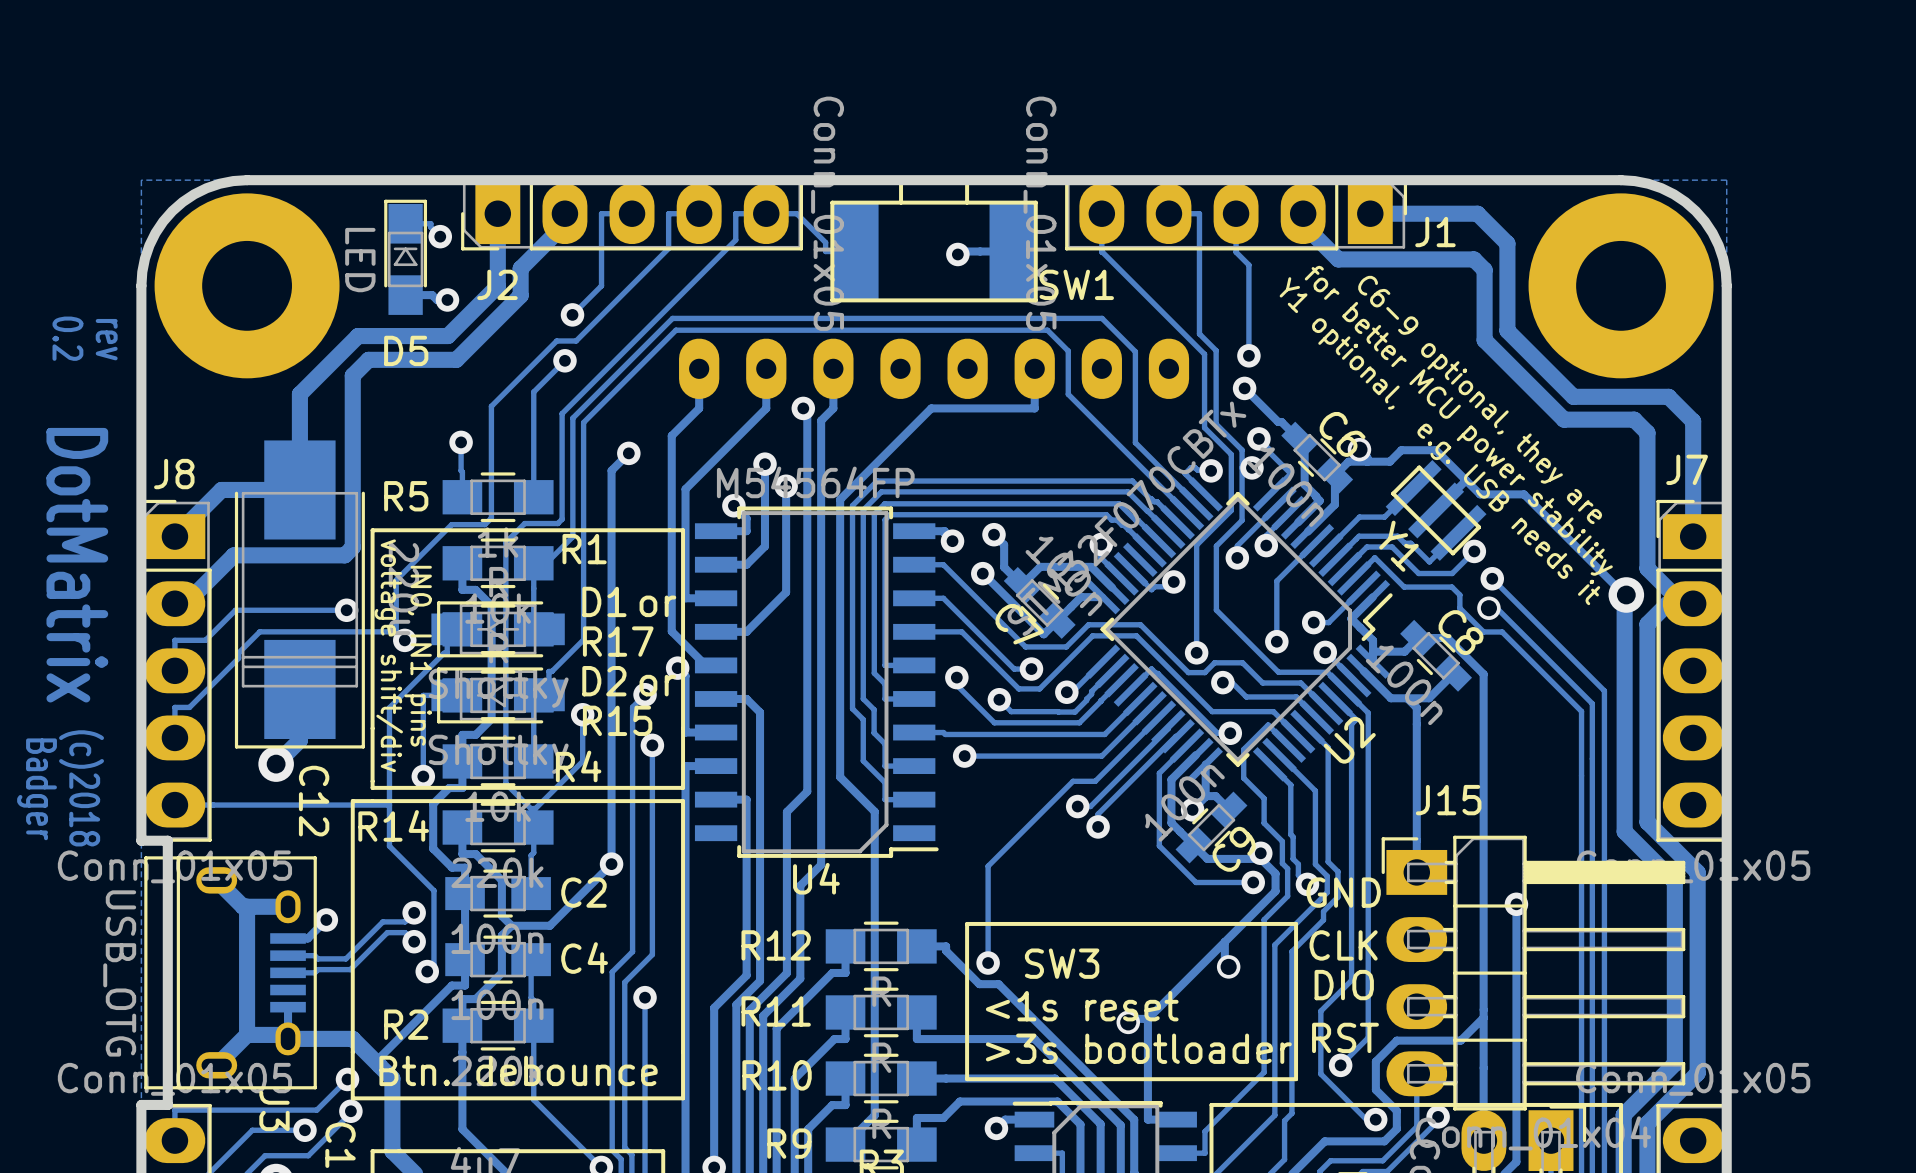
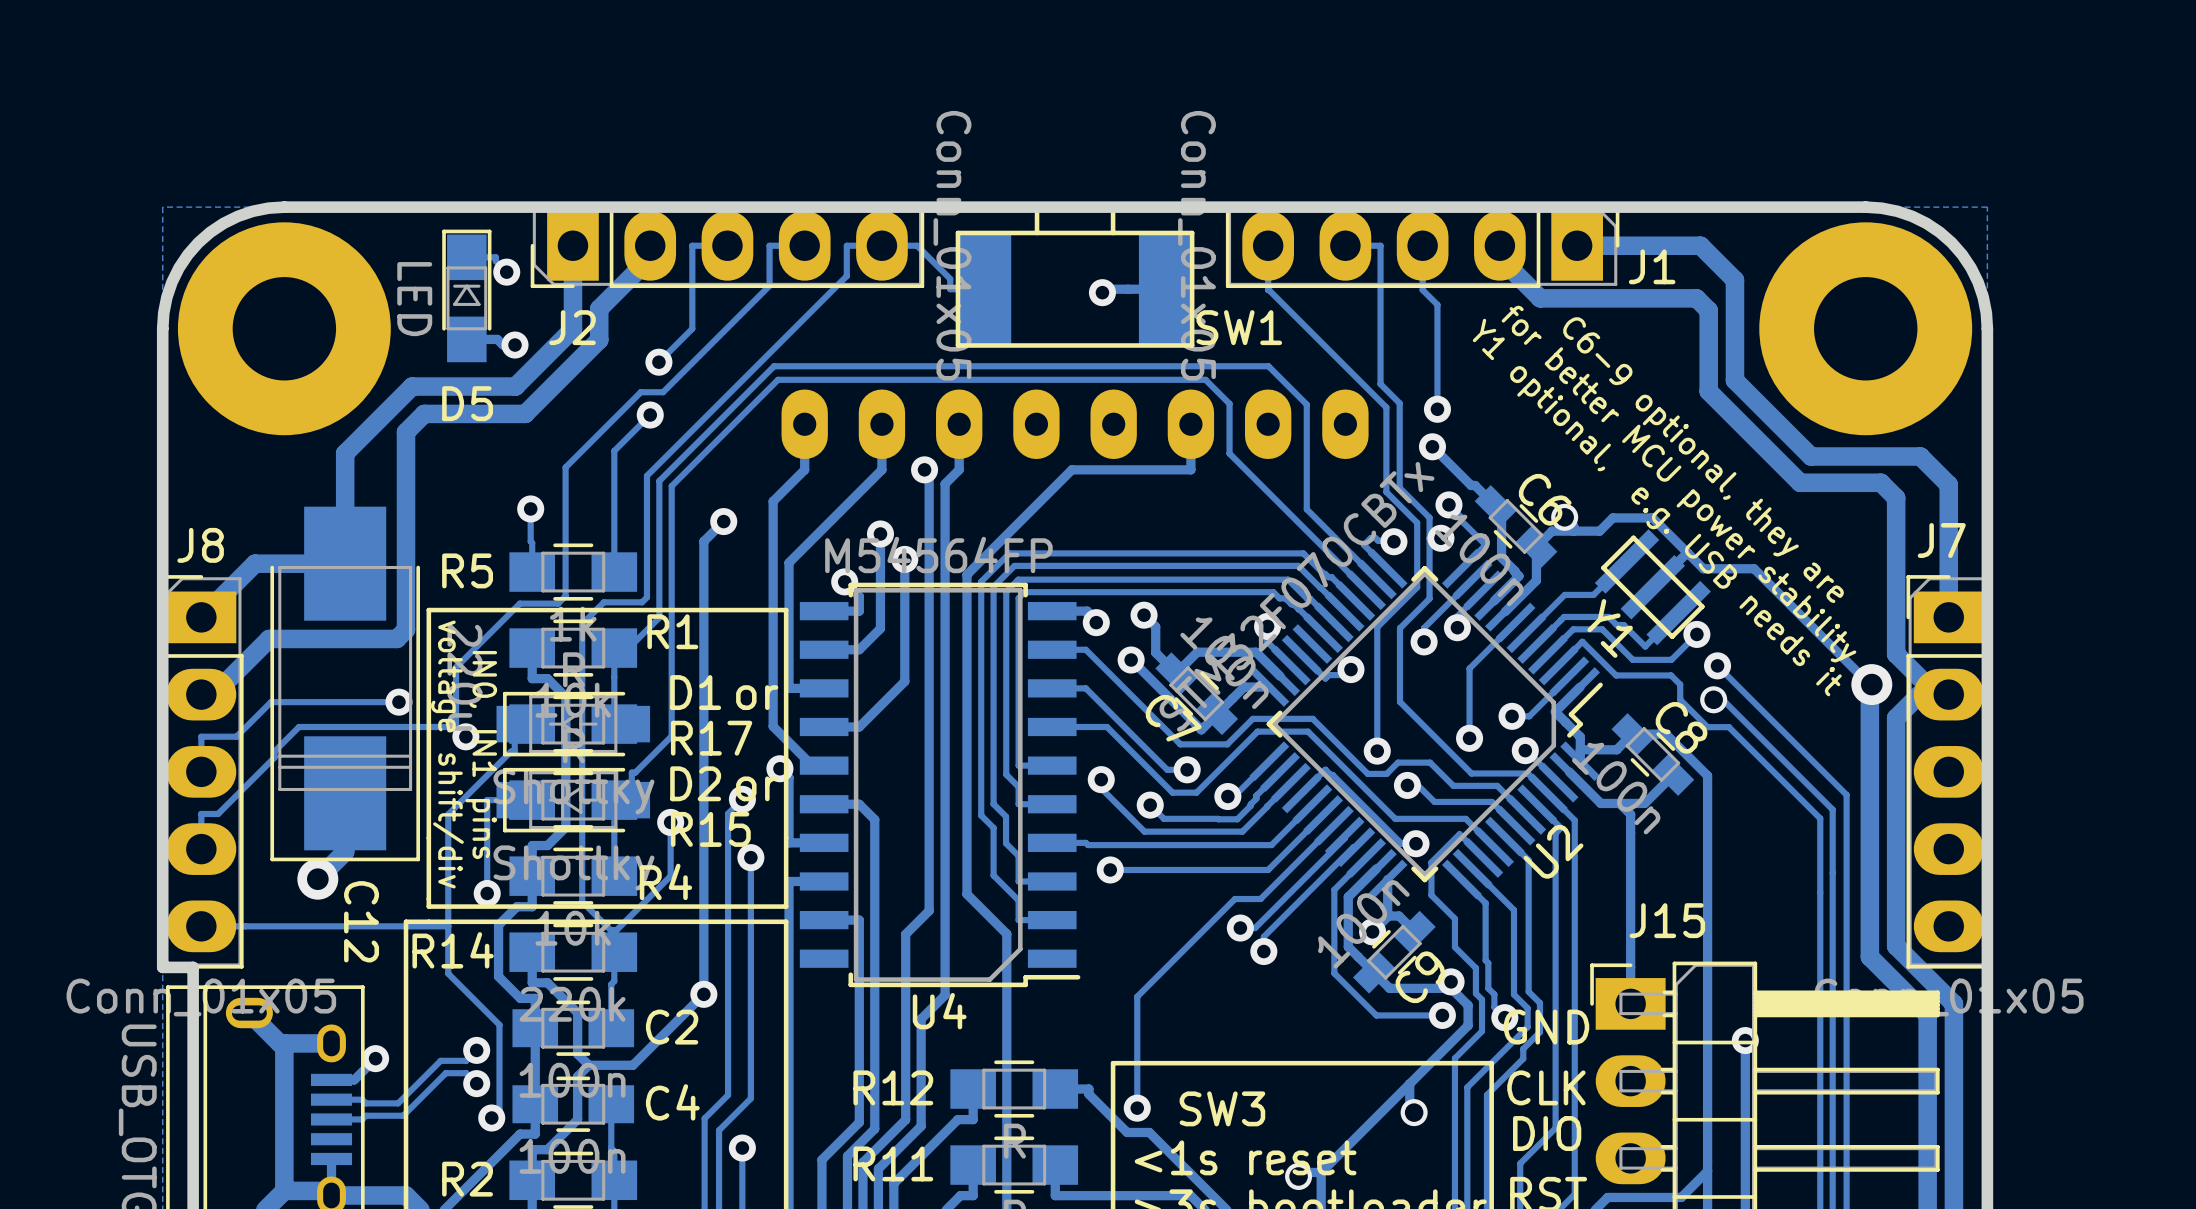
text: 0.2 (67, 338) -> none
text: rev (106, 339) -> none
text: DotMatrix (77, 565) -> none
text: (c)2018 (81, 788) -> none
text: Badger (37, 789) -> none

